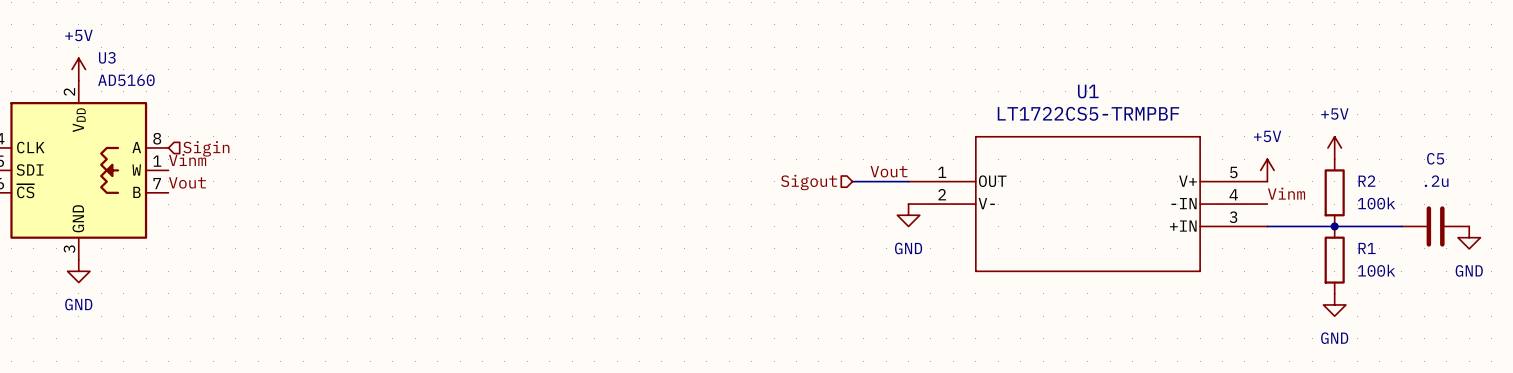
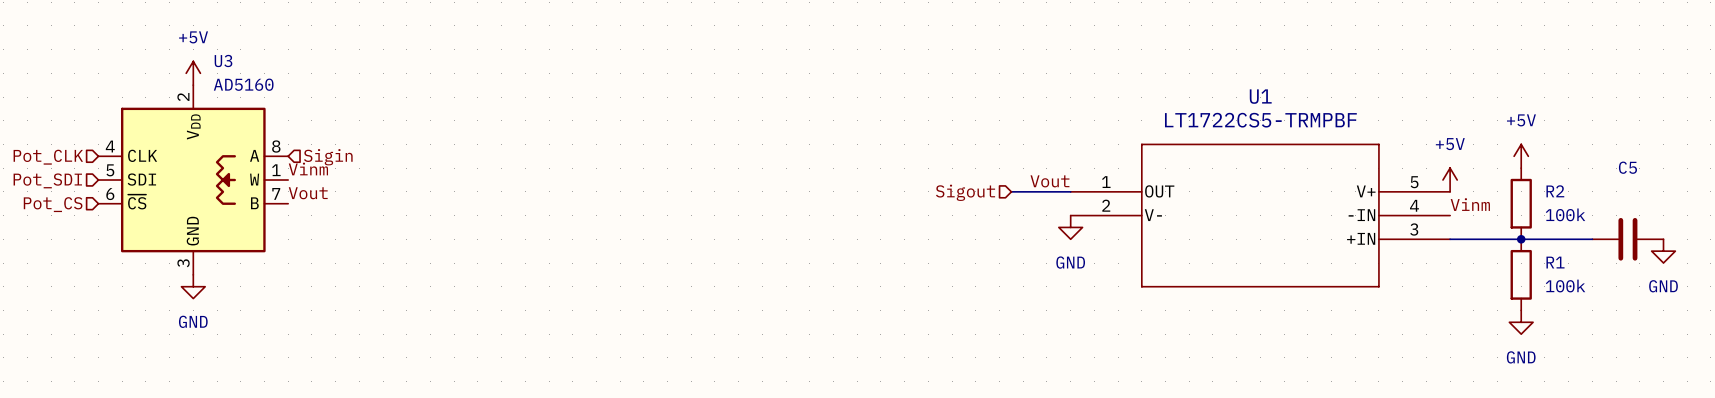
C5 value: .2u (1436, 181) -> none

